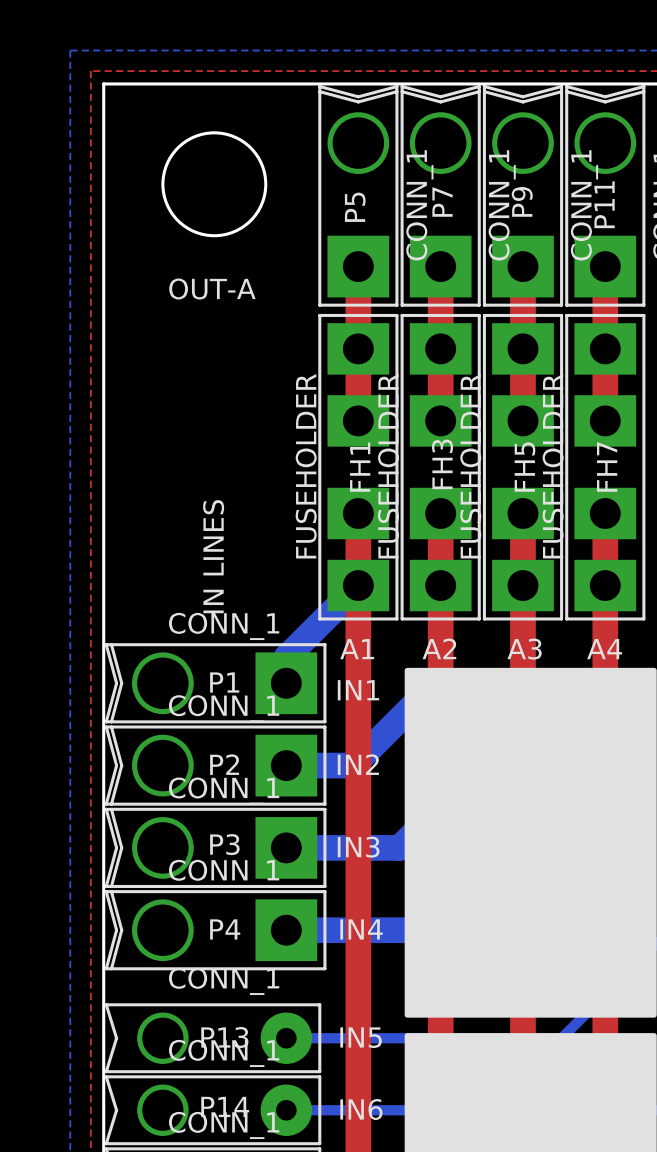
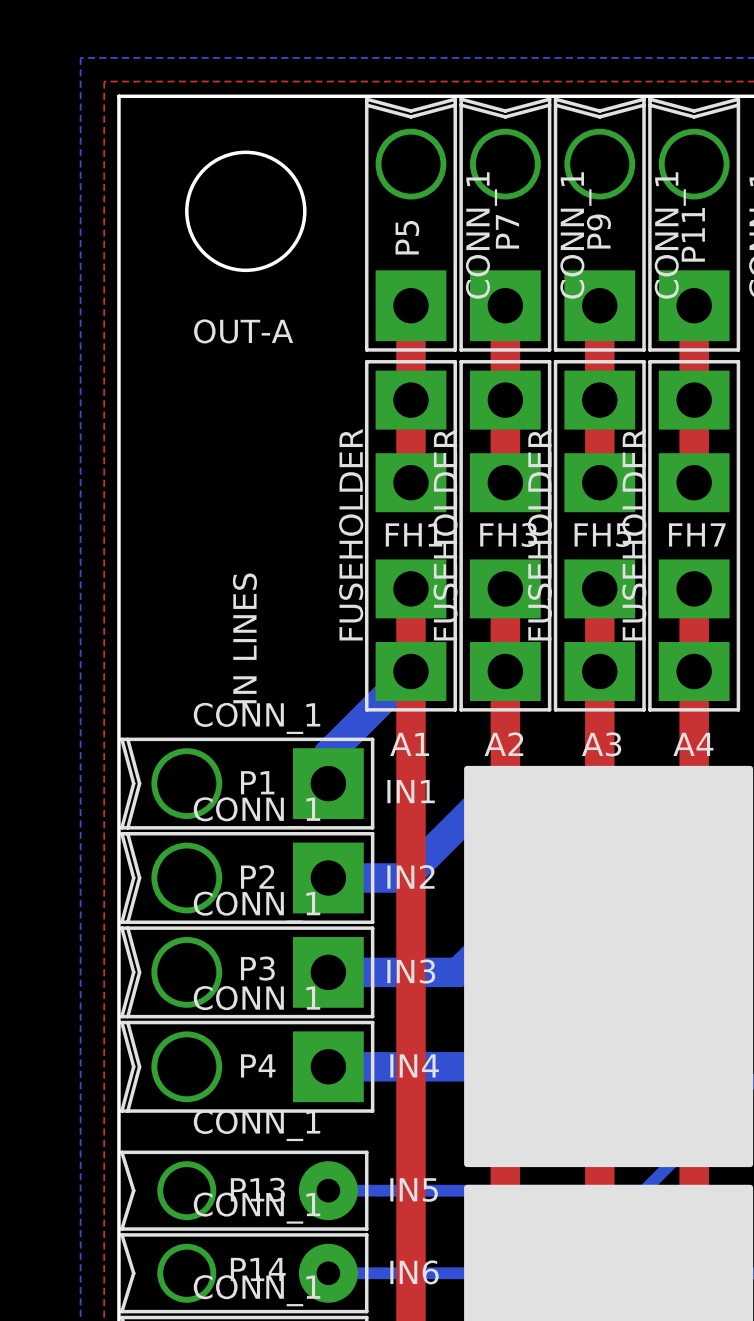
FH3 name rotation: 0° (442, 464) -> 90° clockwise (508, 534)
FH1 name rotation: 0° (360, 467) -> 90° clockwise (414, 534)
FH5 name rotation: 0° (525, 467) -> 90° clockwise (602, 535)
FH7 name rotation: 0° (607, 467) -> 90° clockwise (697, 534)

